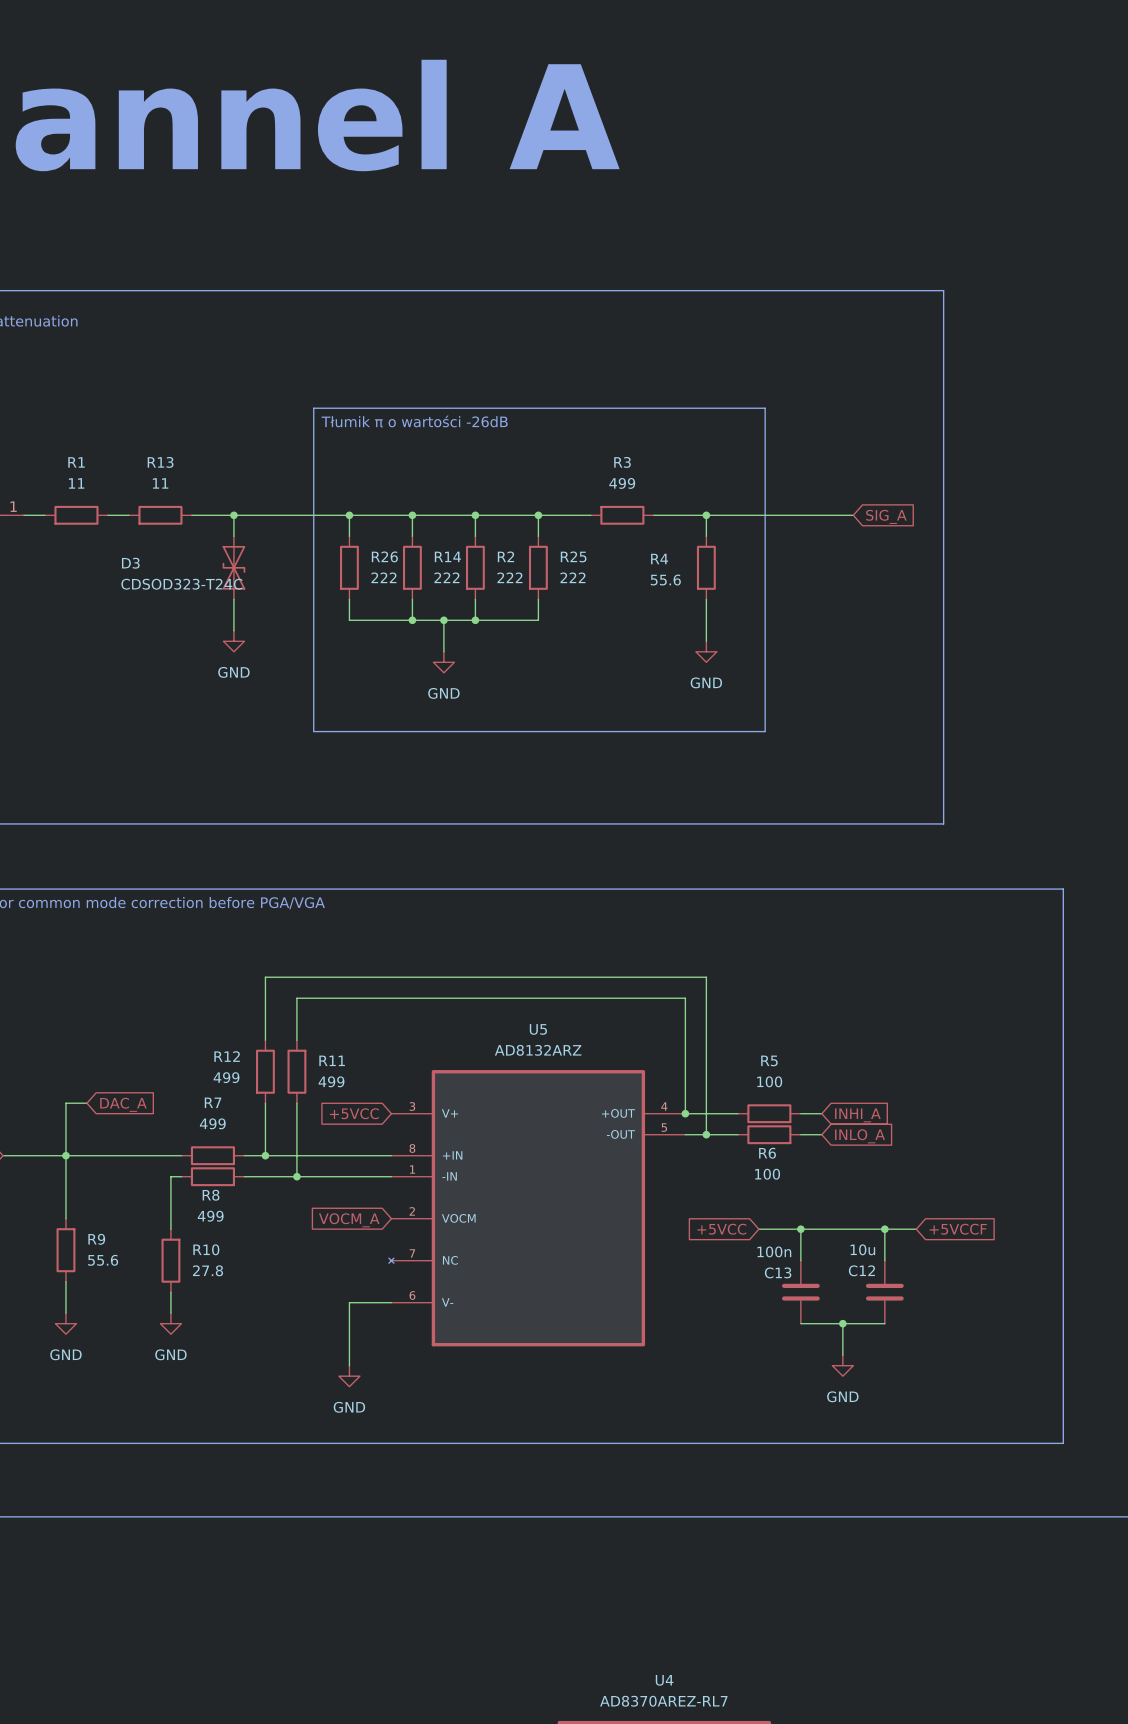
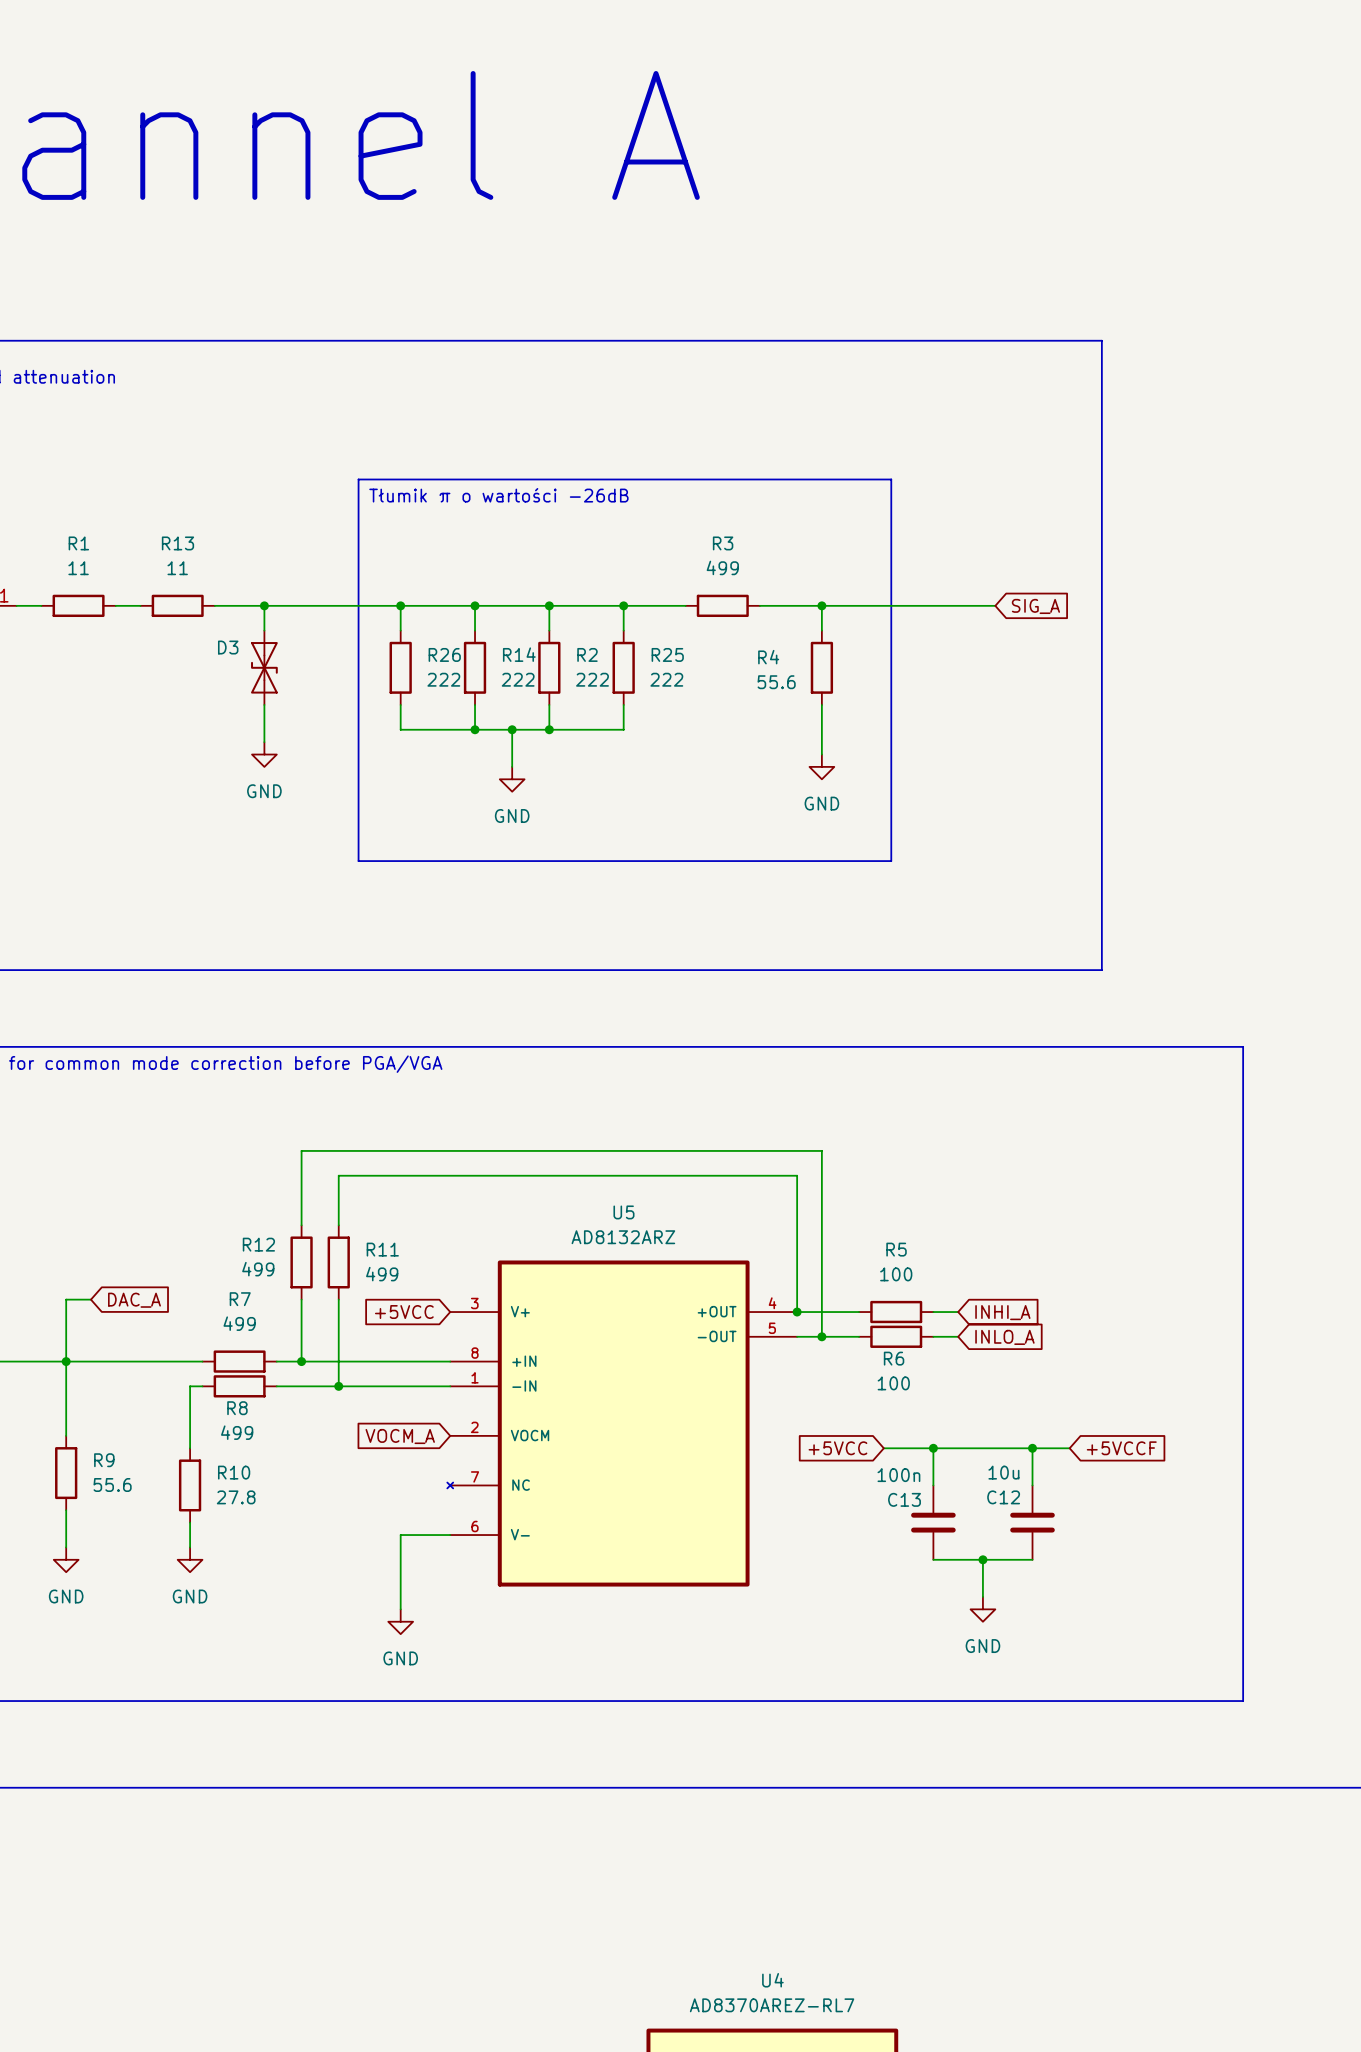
D3 name position: D3 (130, 563) -> D3 (228, 647)
D3 value: CDSOD323-T24C (181, 584) -> none

